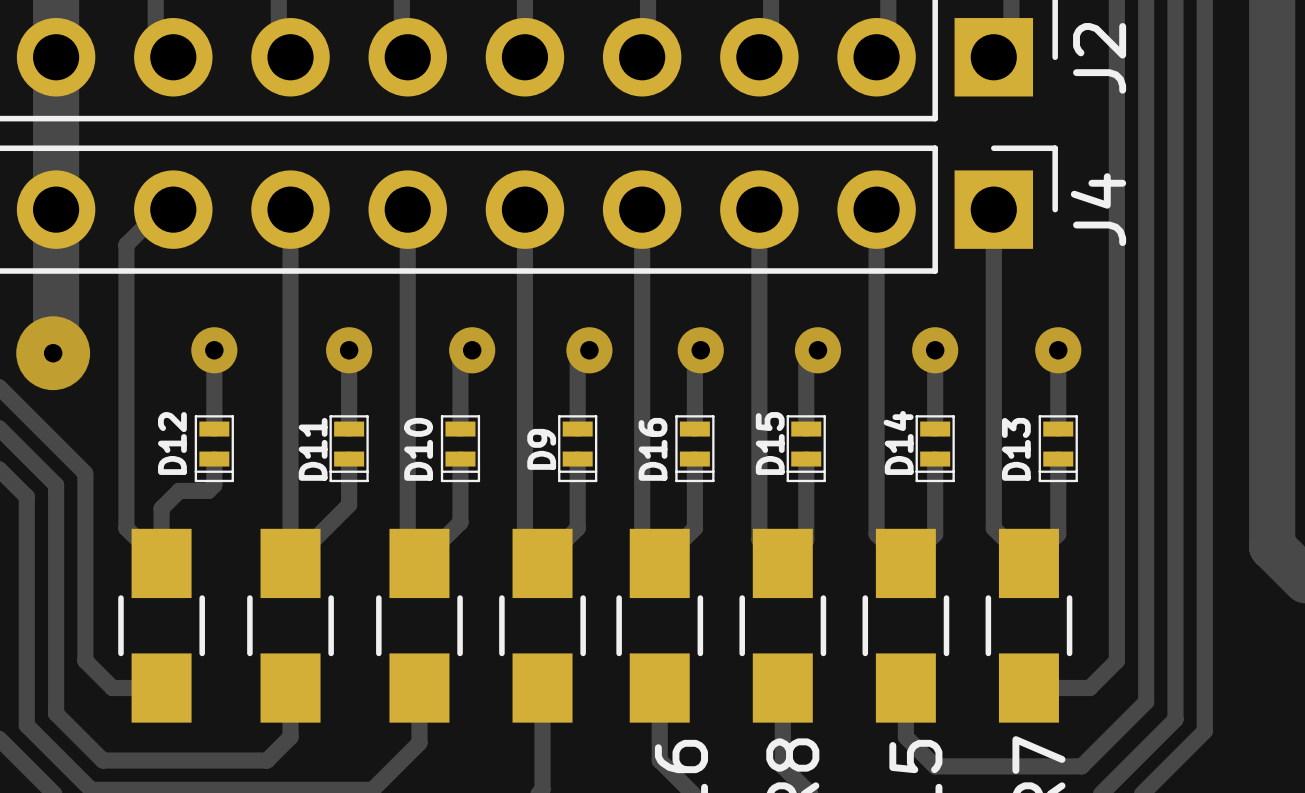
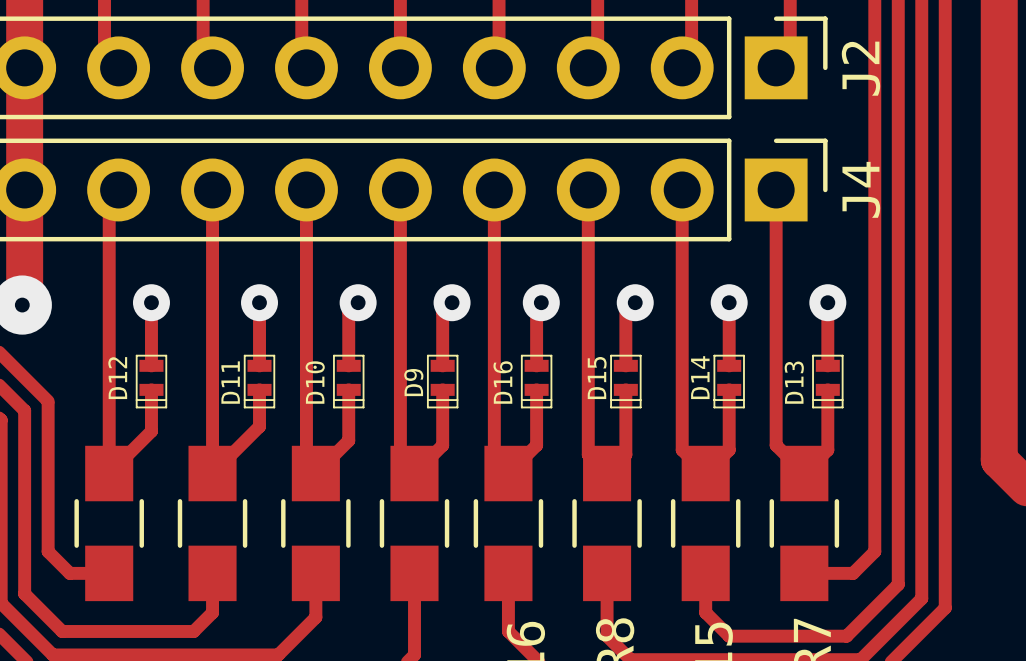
track: (173, 209) (161, 209) (126, 244) (126, 528) (161, 563) -> (118, 189) (109, 199) (109, 429)
track: (214, 485) (208, 490) (179, 490) (161, 508) -> (151, 410) (151, 431) (109, 473)

